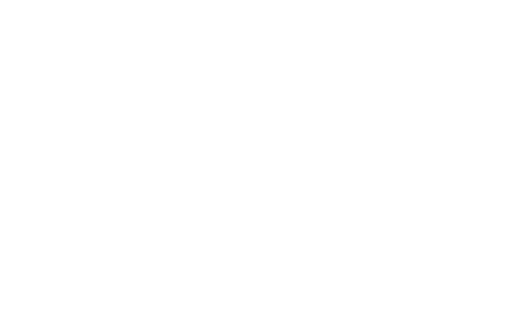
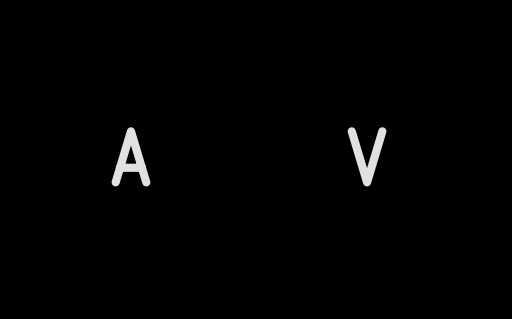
text: none -> A (130, 156)
text: none -> V (367, 156)

